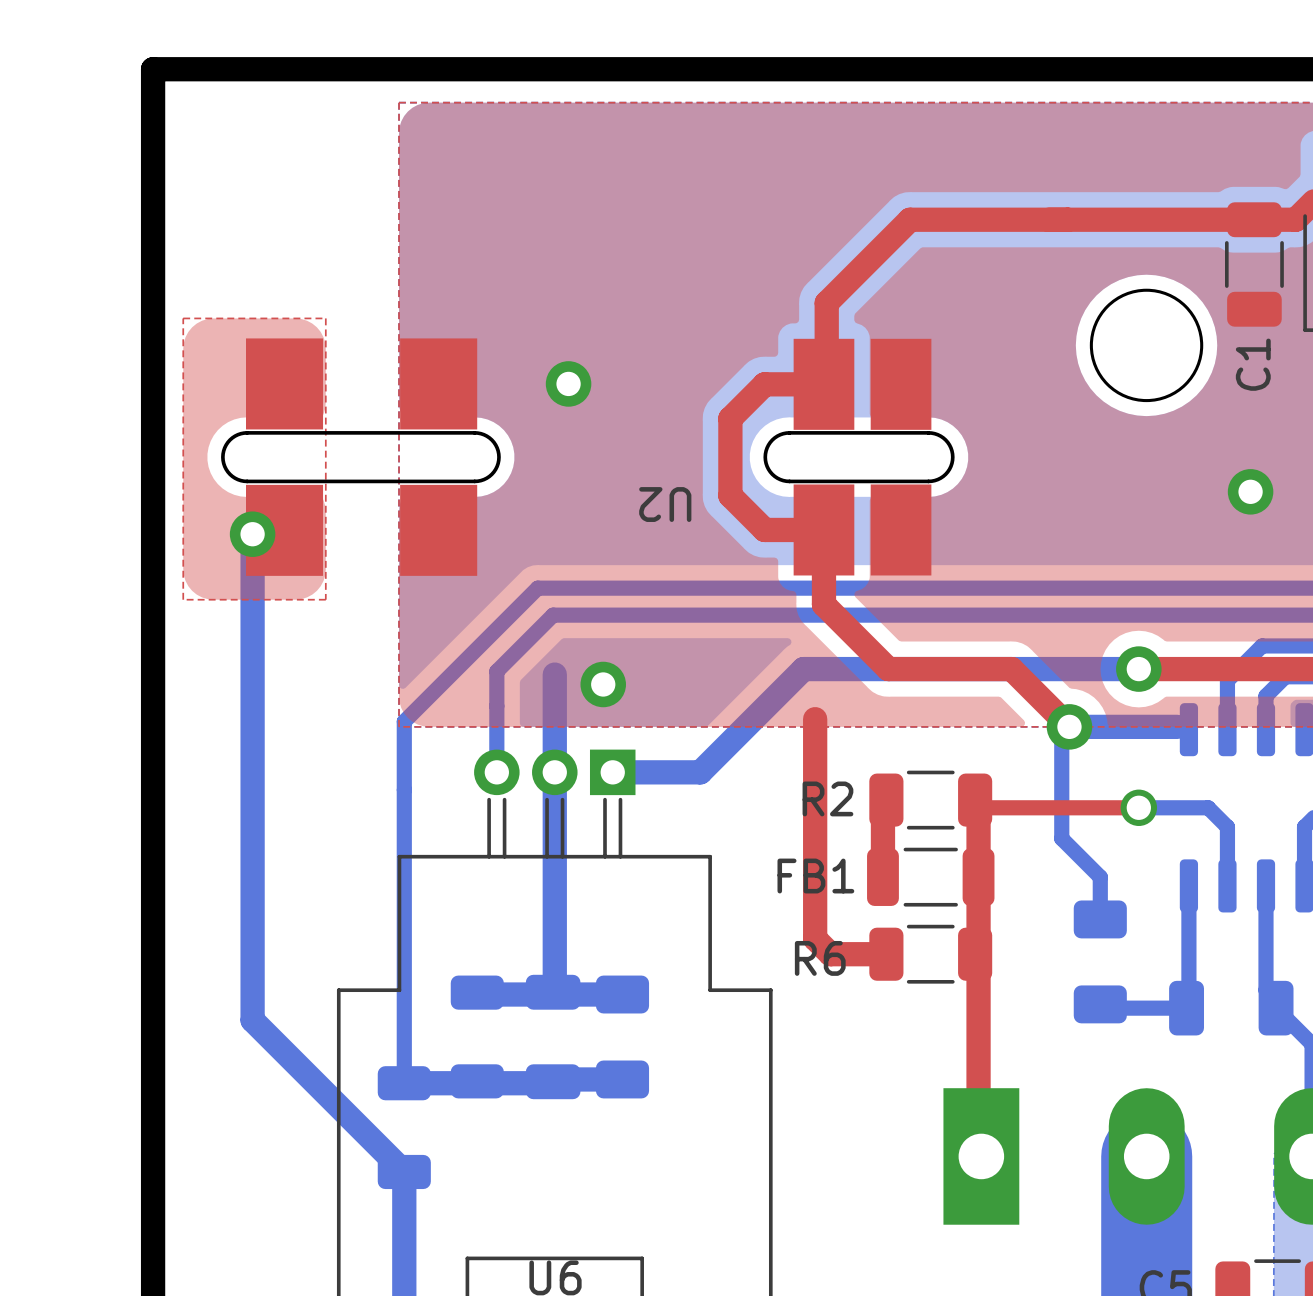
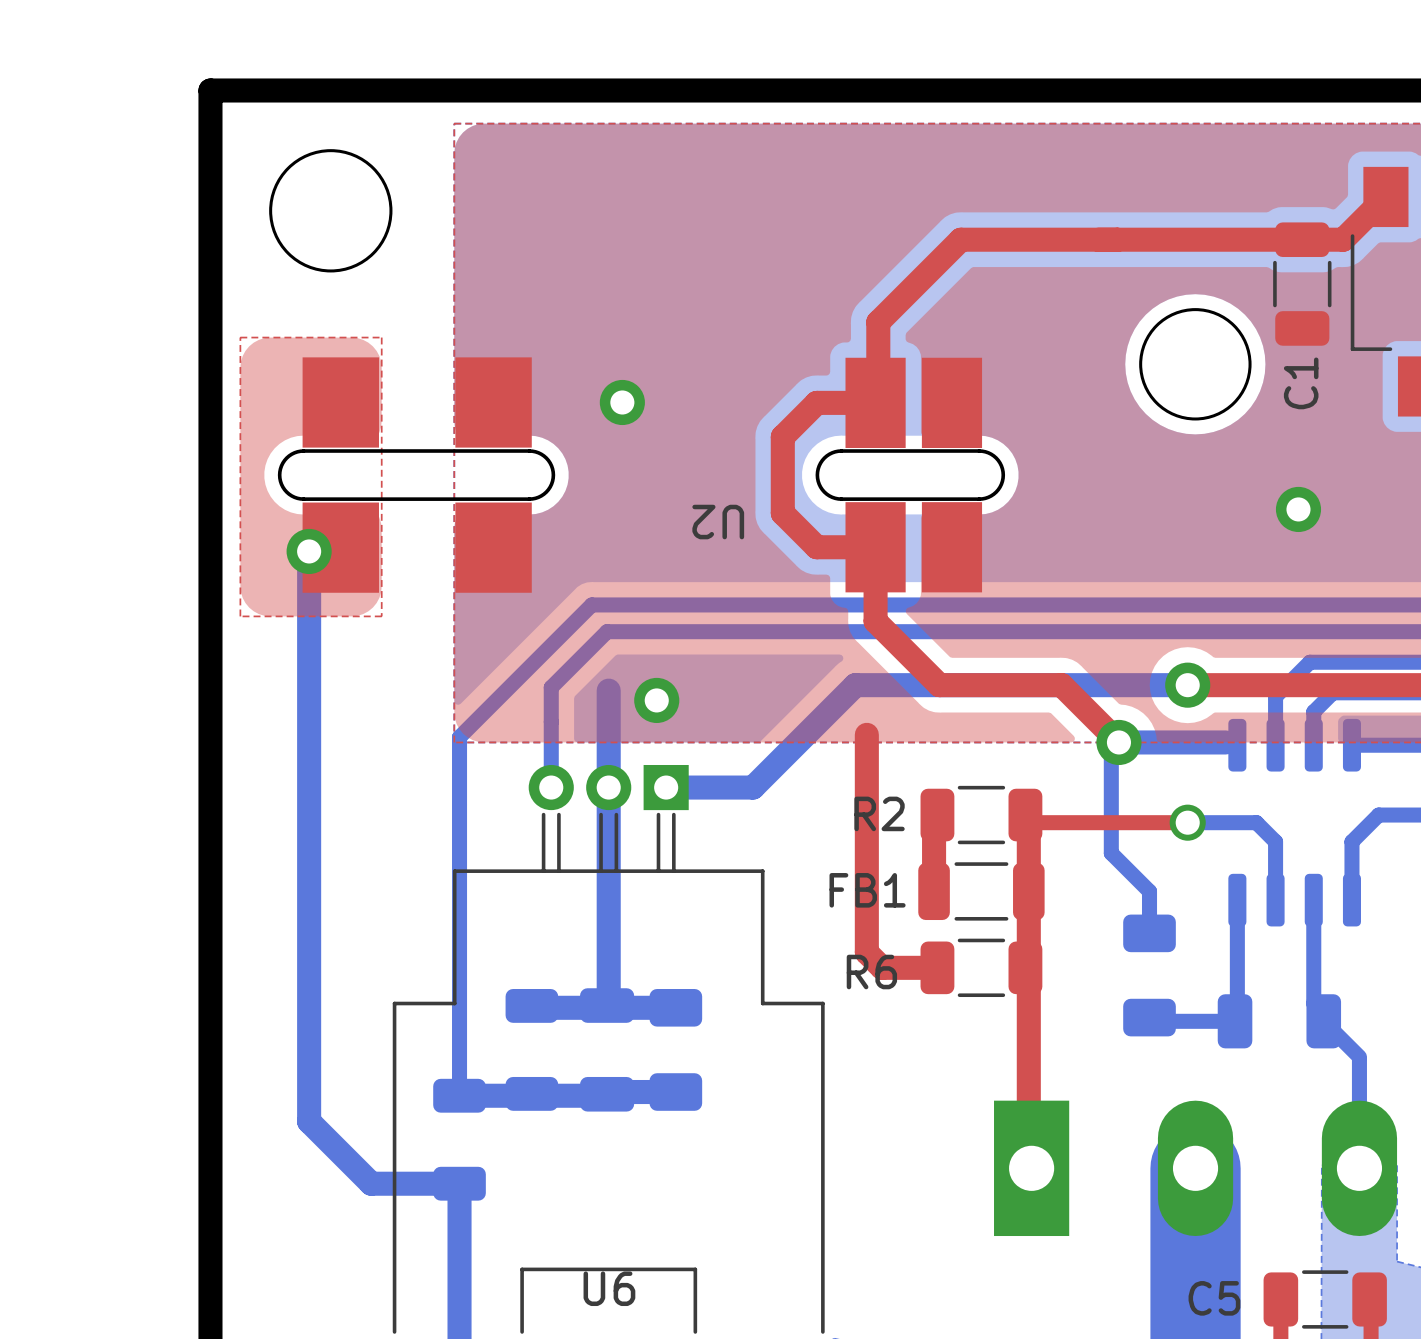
round board edge: none -> [269, 149, 393, 273]
bottom track: (252, 1020) (404, 1171) -> (309, 1033) (309, 1121) (371, 1183) (459, 1183)

